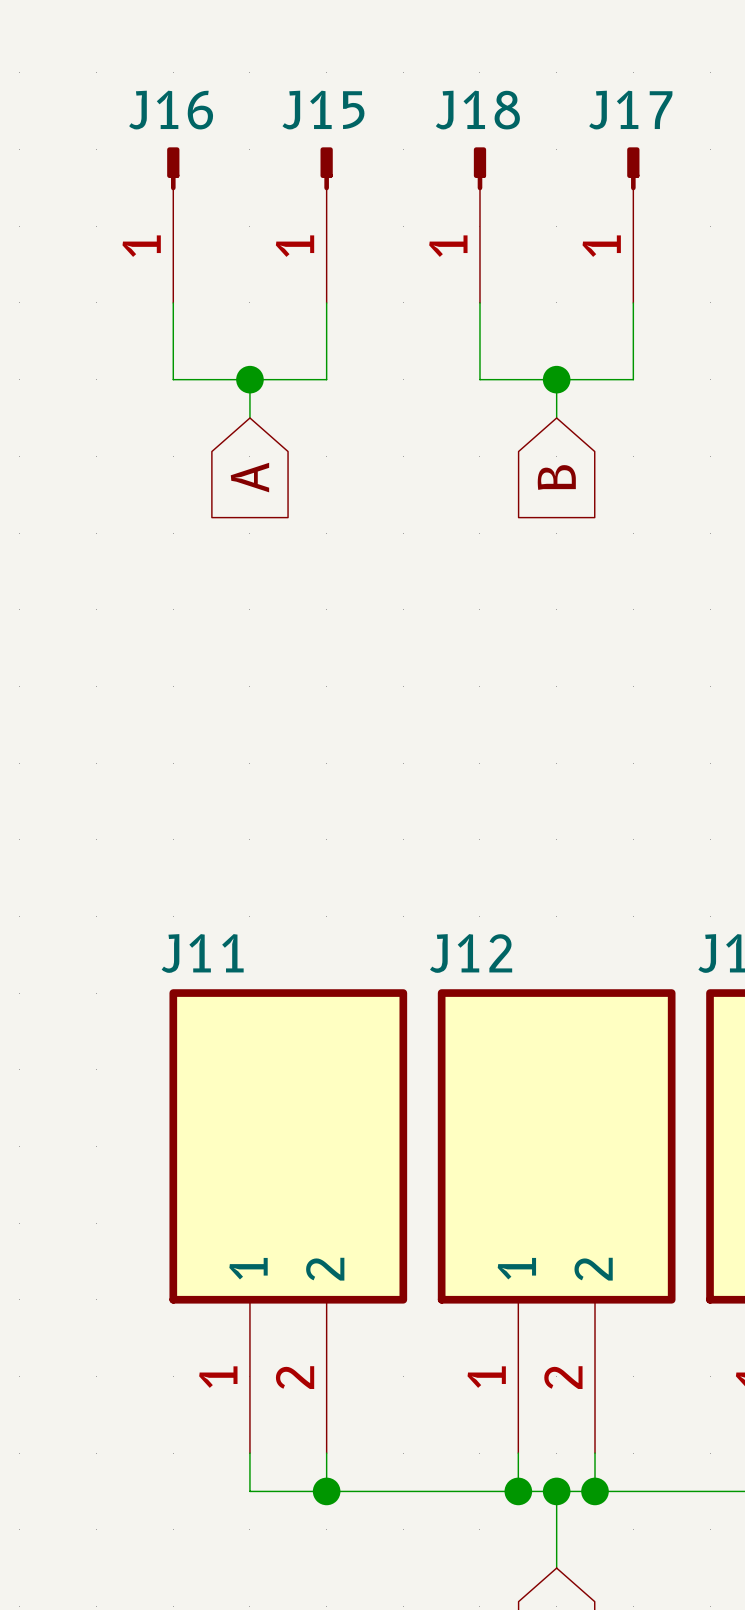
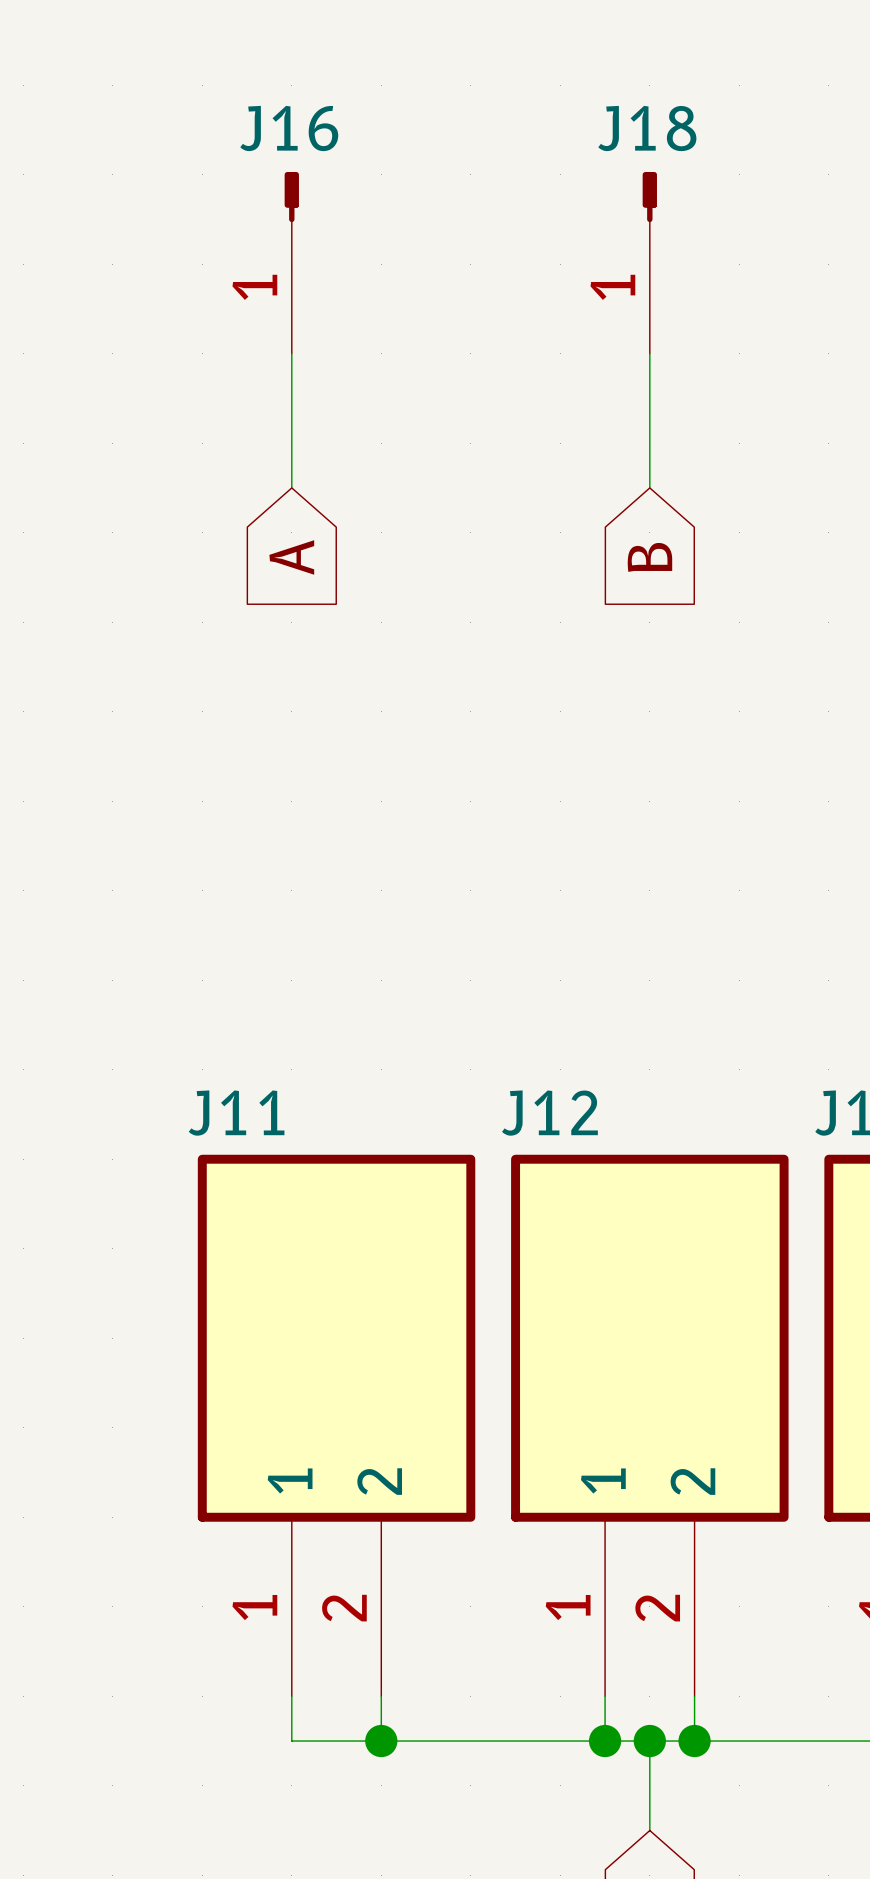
J16 position: (173, 225) -> (291, 262)
J15: (326, 225) -> none
J18 position: (479, 225) -> (649, 262)
J17: (633, 225) -> none
wire: (173, 302) (173, 379) (326, 379) (326, 302) -> none
wire: none -> (291, 353) (291, 443)
wire: (479, 302) (479, 379) (633, 379) (633, 302) -> none
wire: none -> (649, 353) (649, 443)
junction: (249, 379) -> none
junction: (556, 379) -> none

